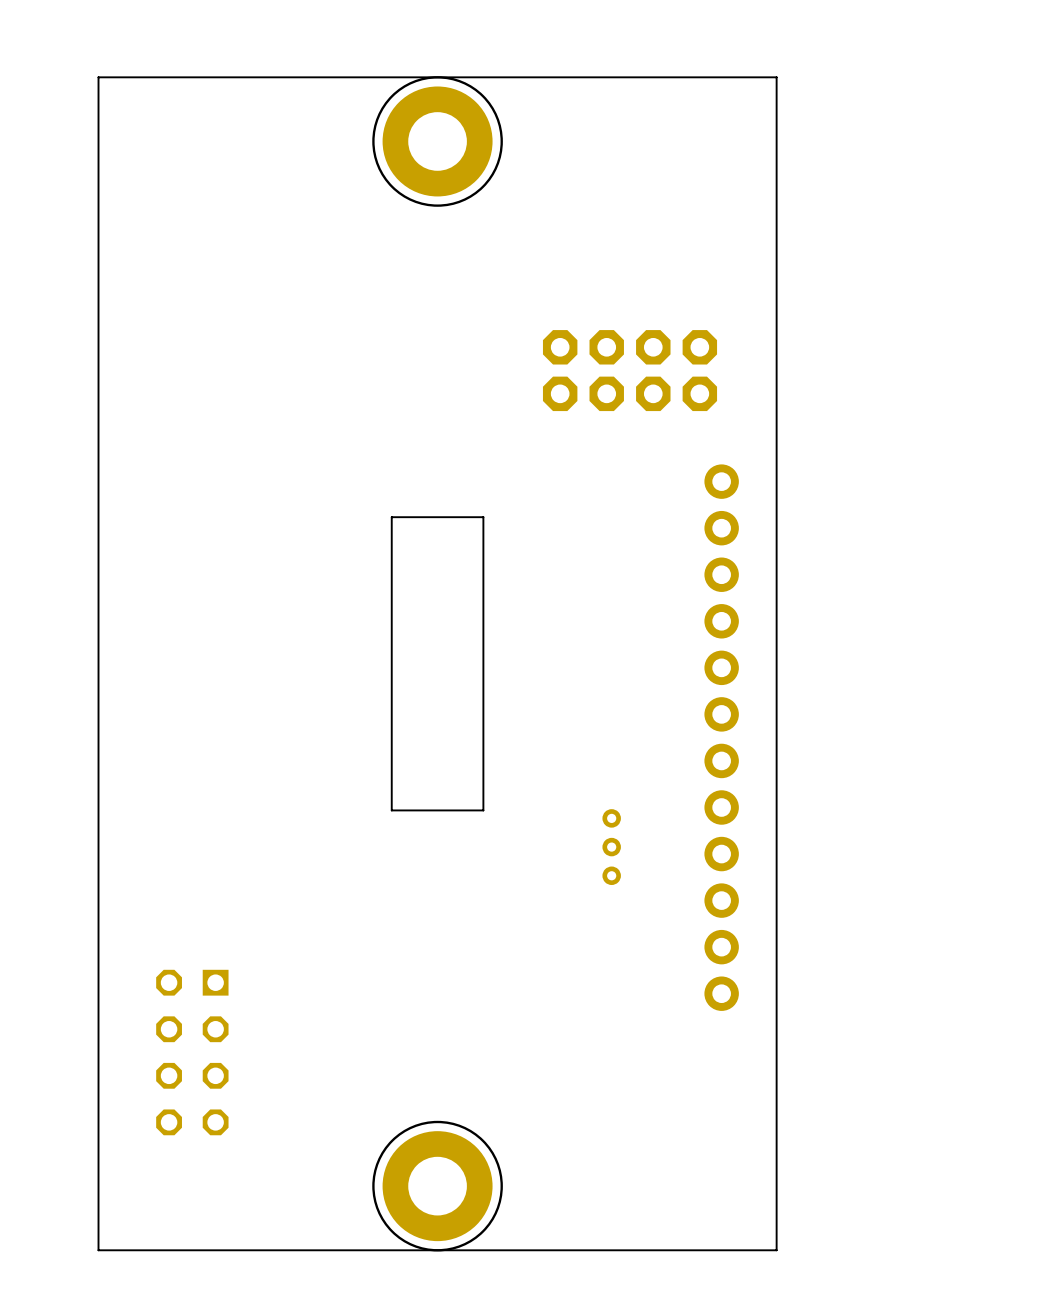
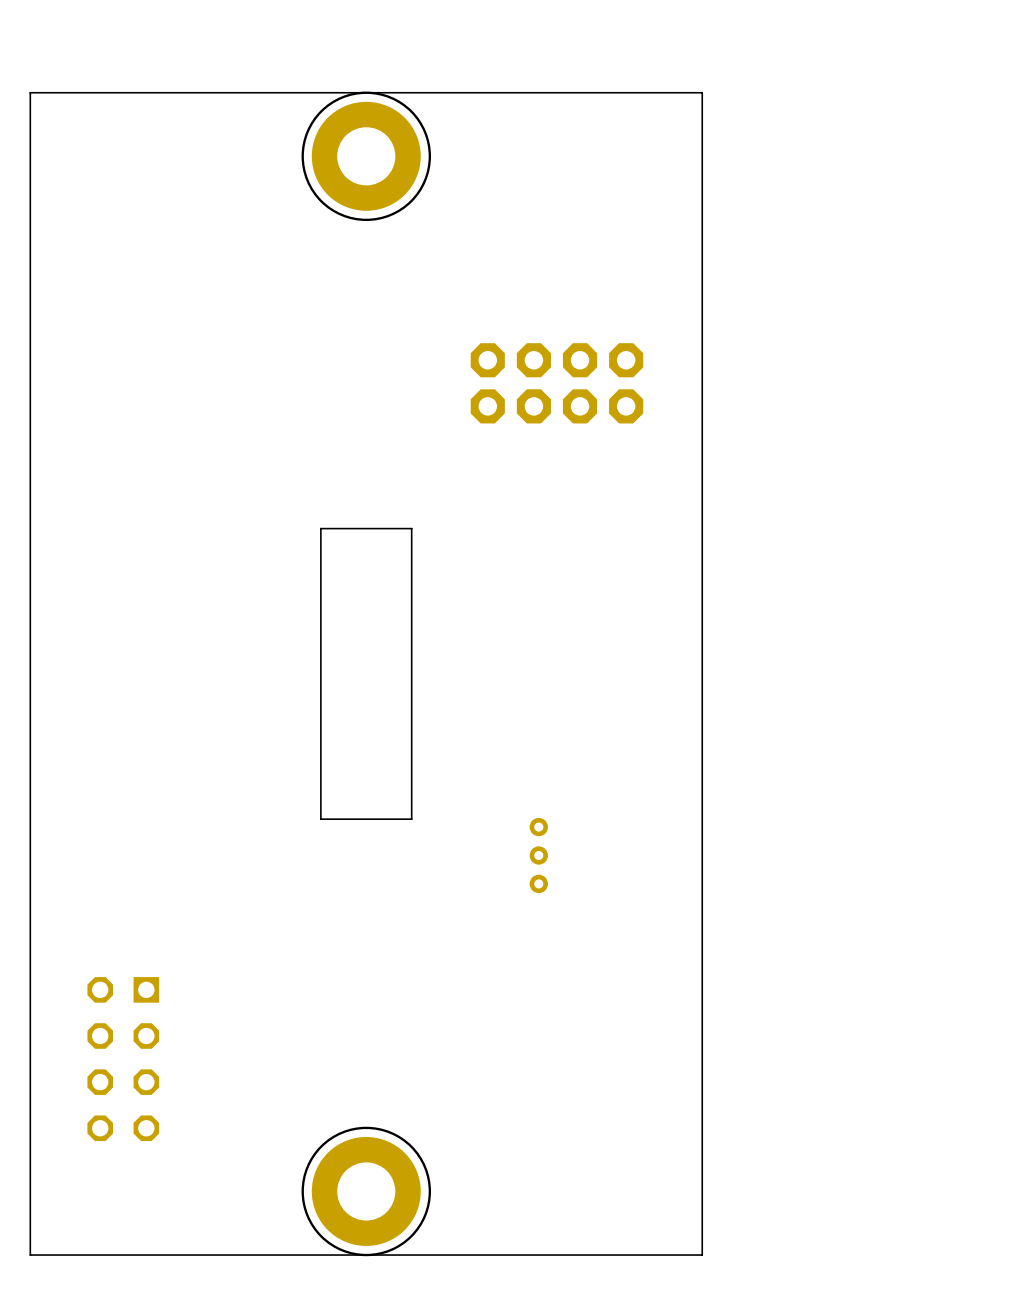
part: (721, 737) -> none

